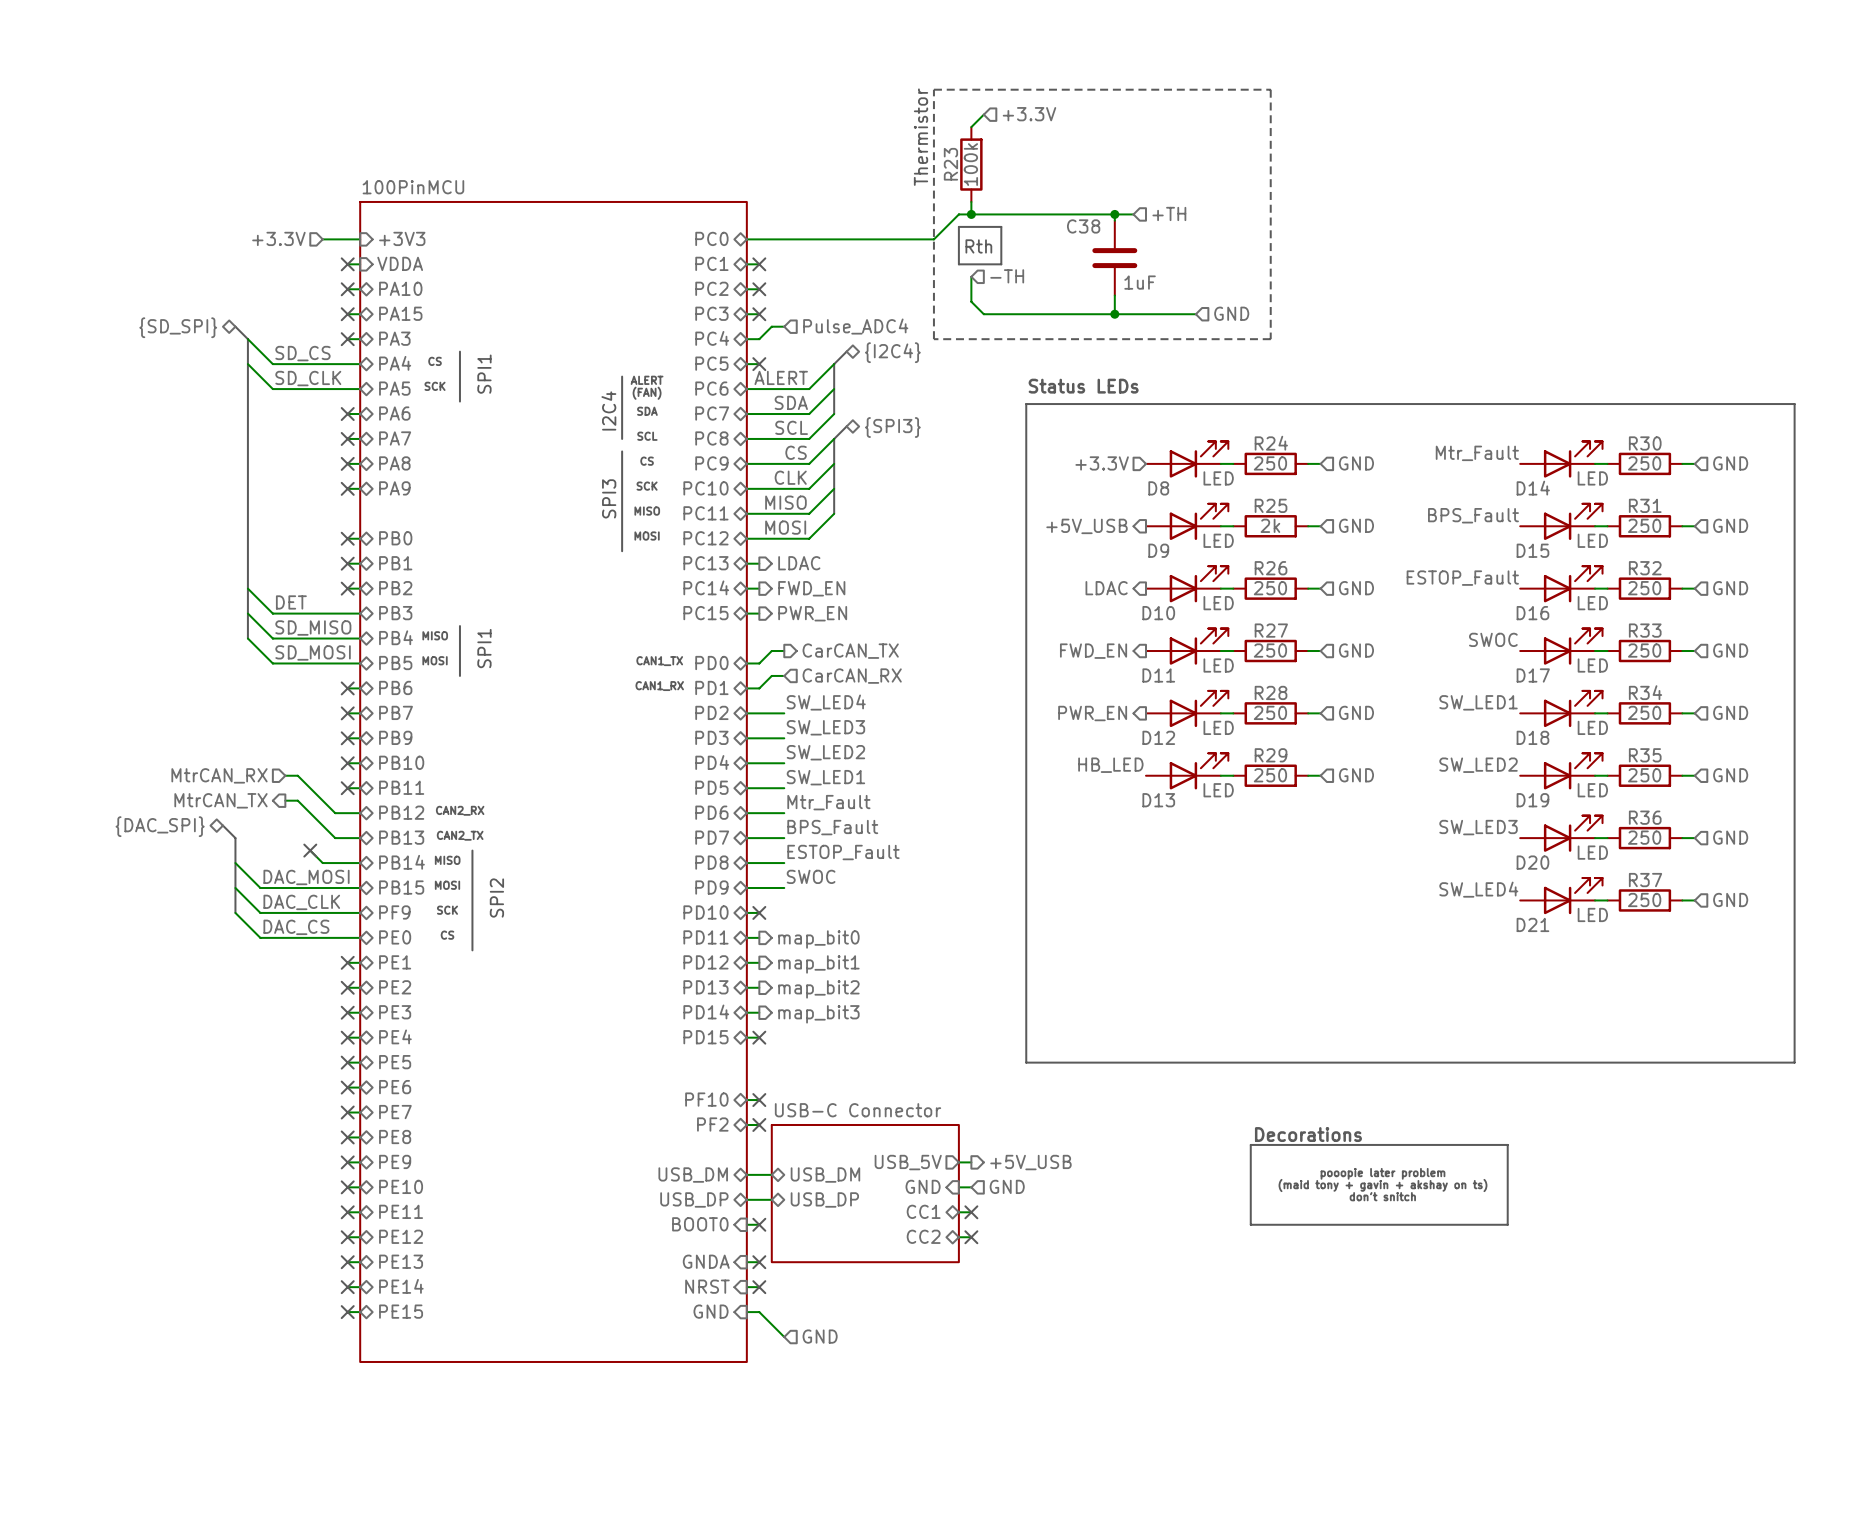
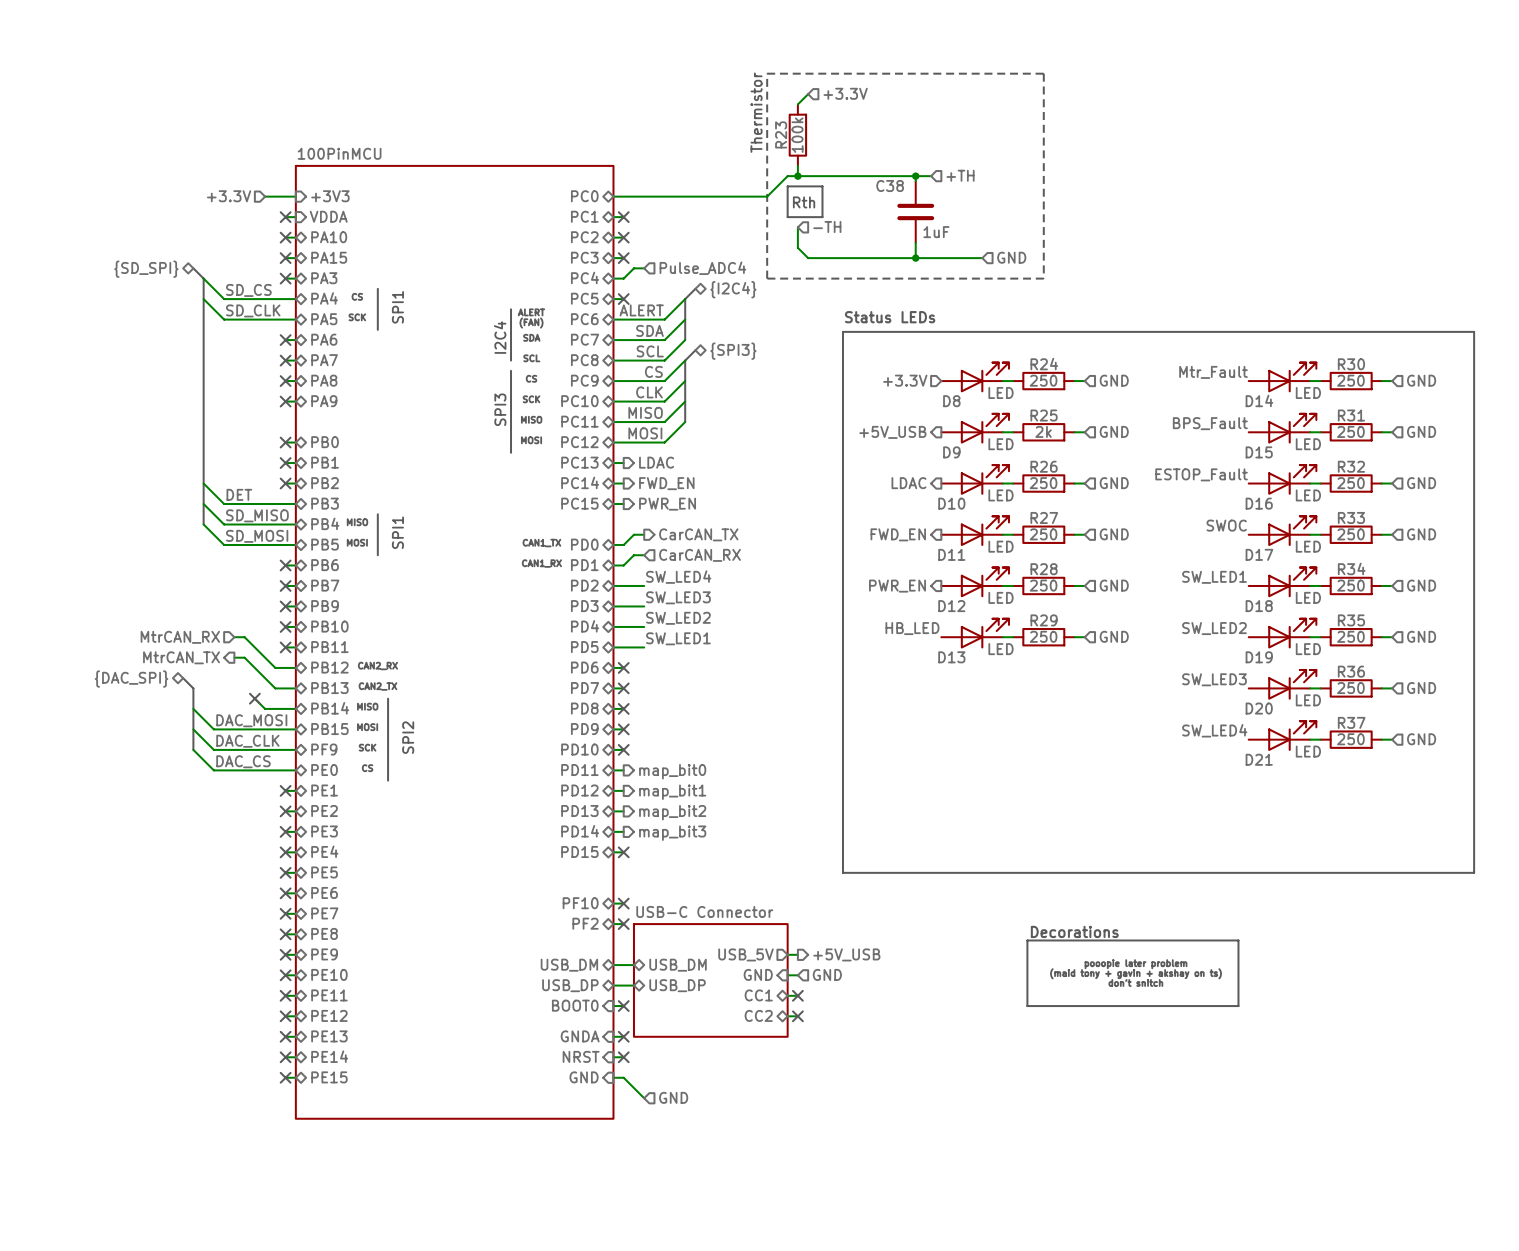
label: Mtr_Fault (828, 802) -> none
wire: (759, 813) (784, 813) -> none
no-connect mark: none -> (623, 667)
label: BPS_Fault (832, 827) -> none
wire: (759, 838) (784, 838) -> none
no-connect mark: none -> (623, 688)
label: ESTOP_Fault (843, 852) -> none
wire: (759, 863) (784, 863) -> none
no-connect mark: none -> (623, 708)
label: SWOC (811, 876) -> none
wire: (759, 888) (784, 888) -> none
no-connect mark: none -> (623, 729)

